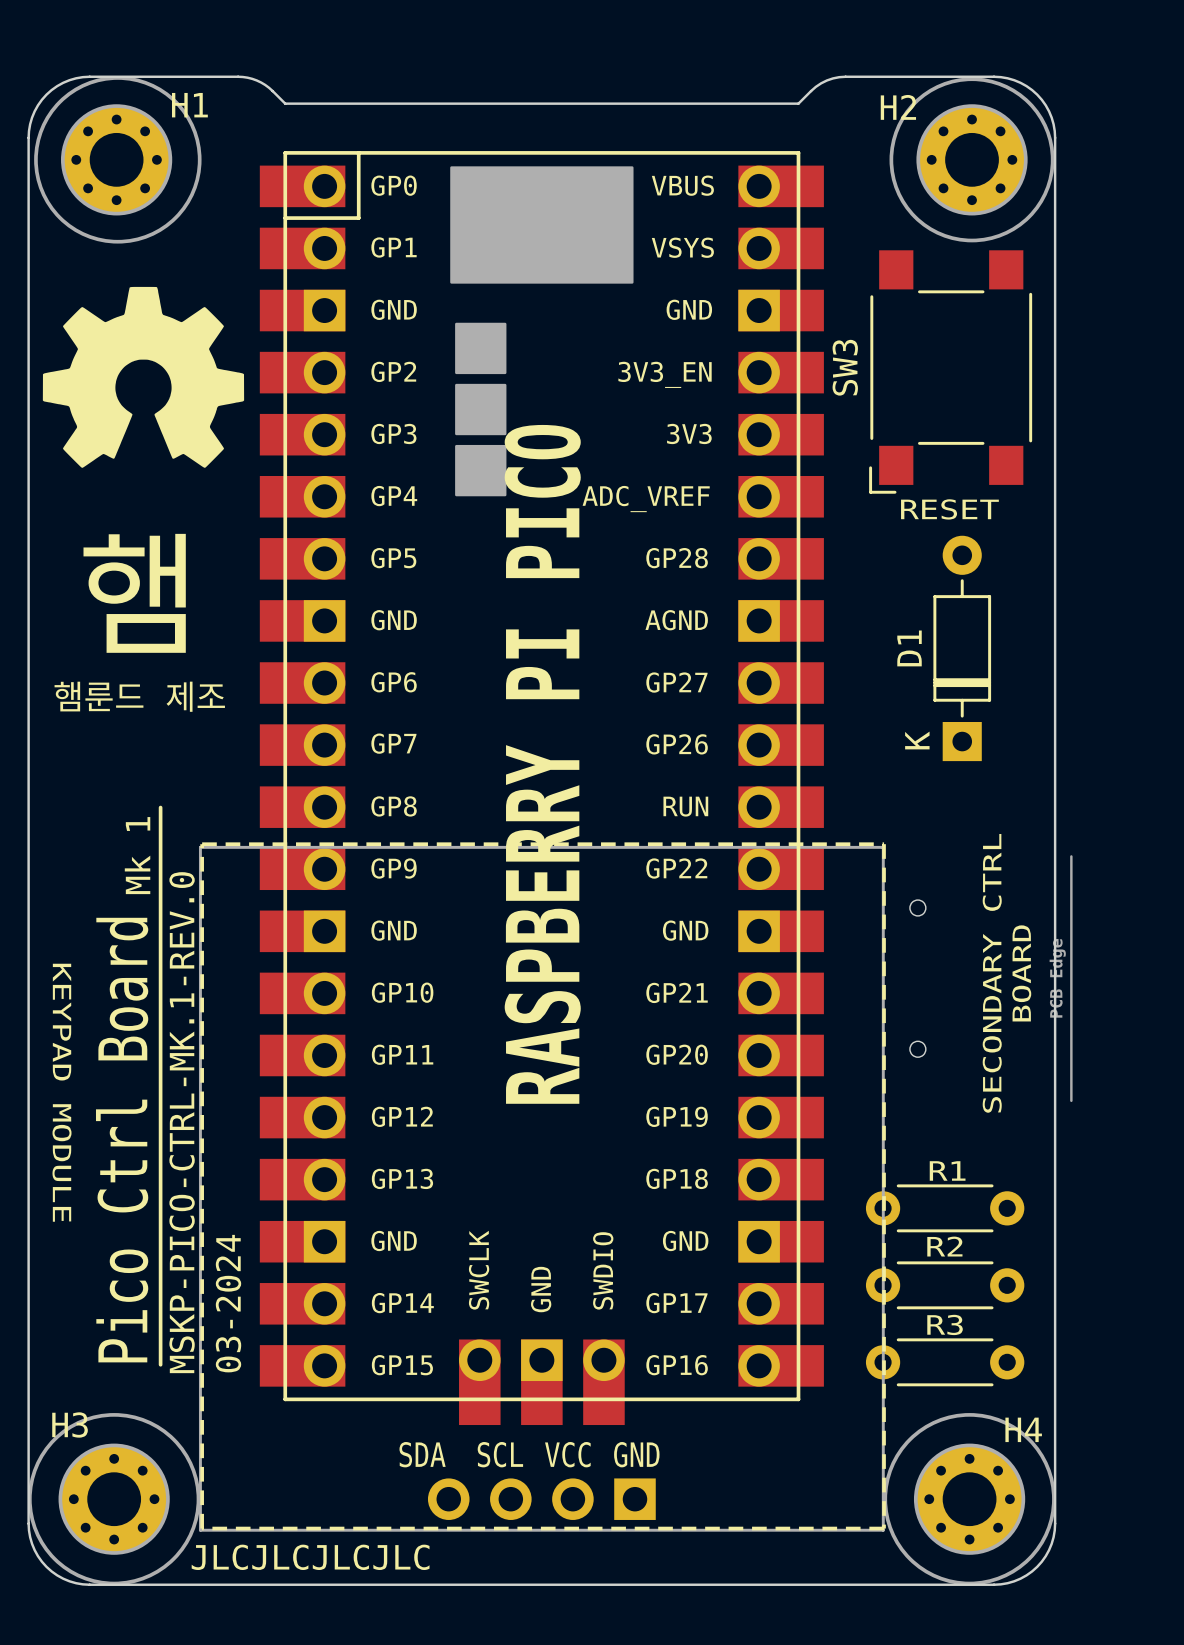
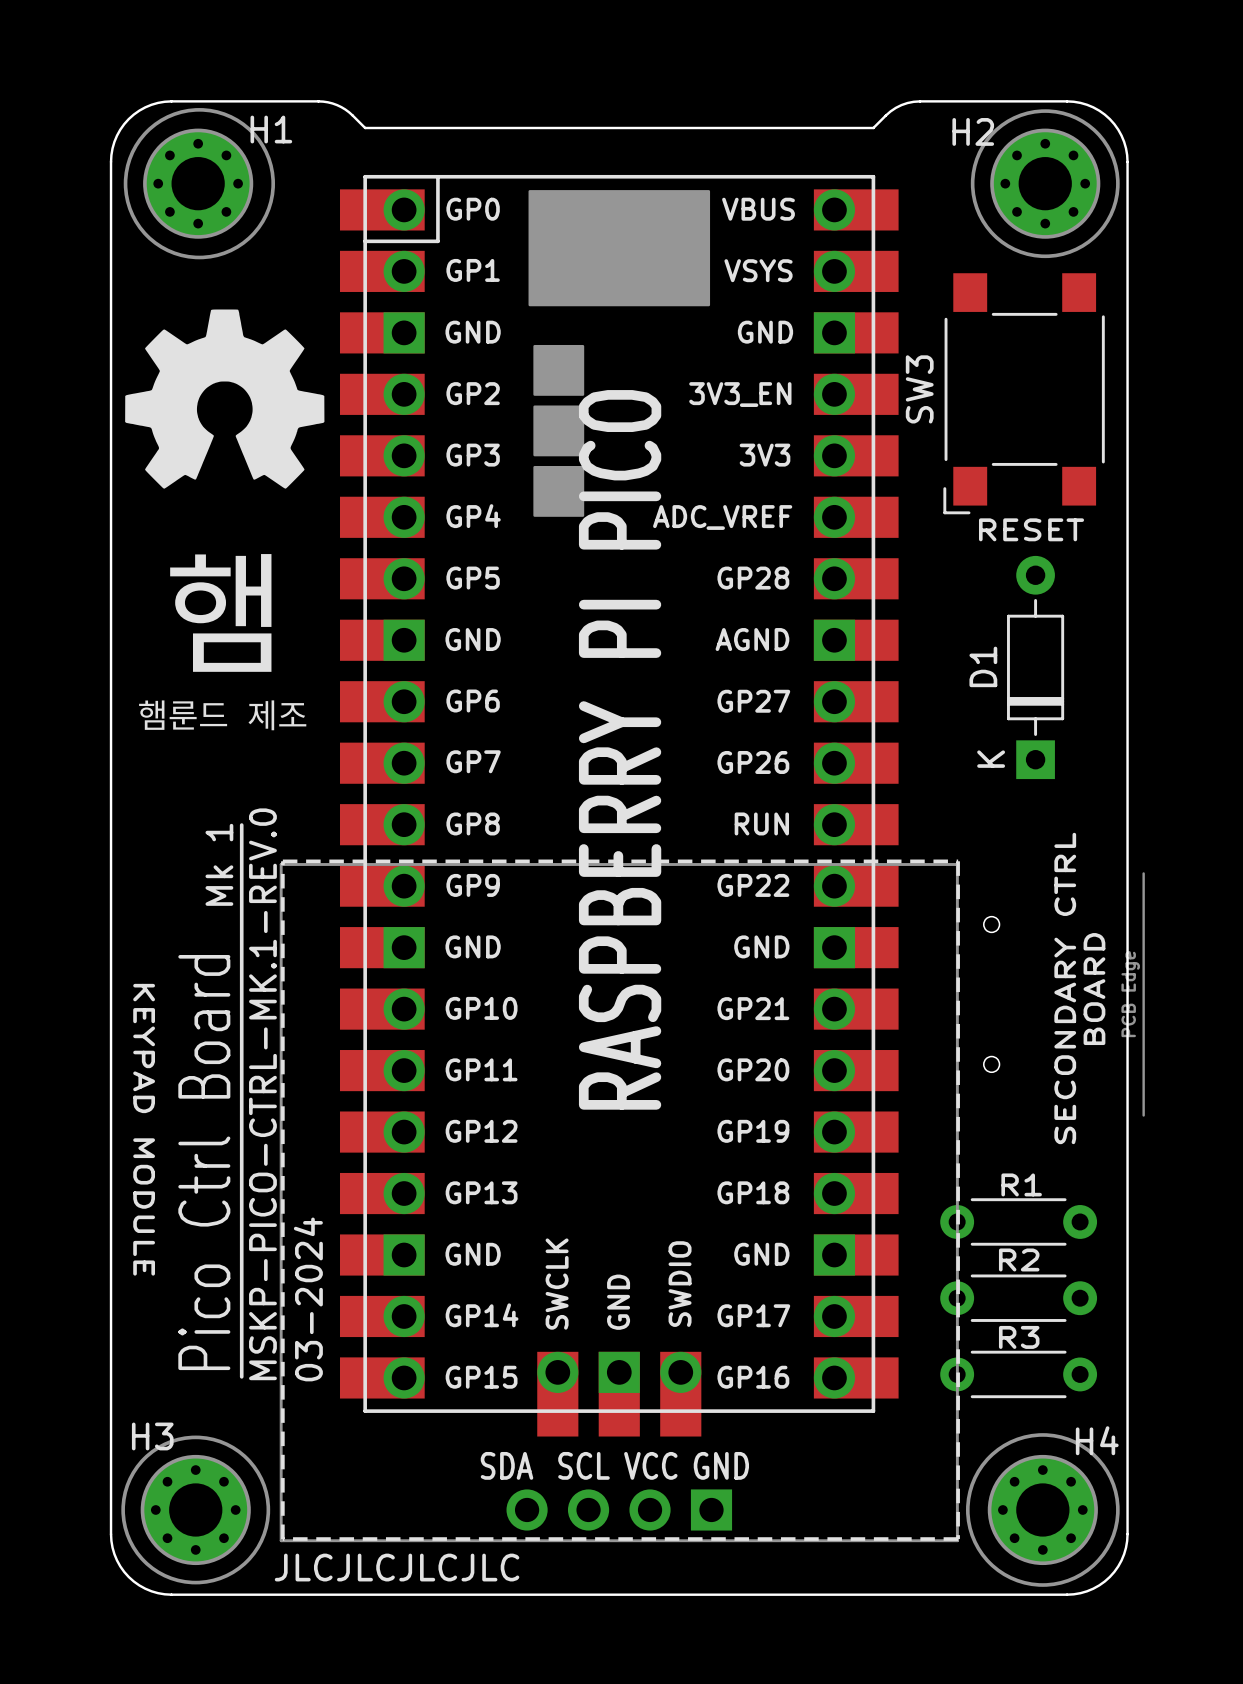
drawing shape: [34, 76, 202, 244] -> [123, 108, 276, 260]
drawing shape: [889, 77, 1055, 243] -> [970, 109, 1120, 259]
drawing shape: [28, 1413, 201, 1586] -> [121, 1435, 271, 1585]
drawing shape: [883, 1413, 1056, 1586] -> [965, 1433, 1120, 1587]

